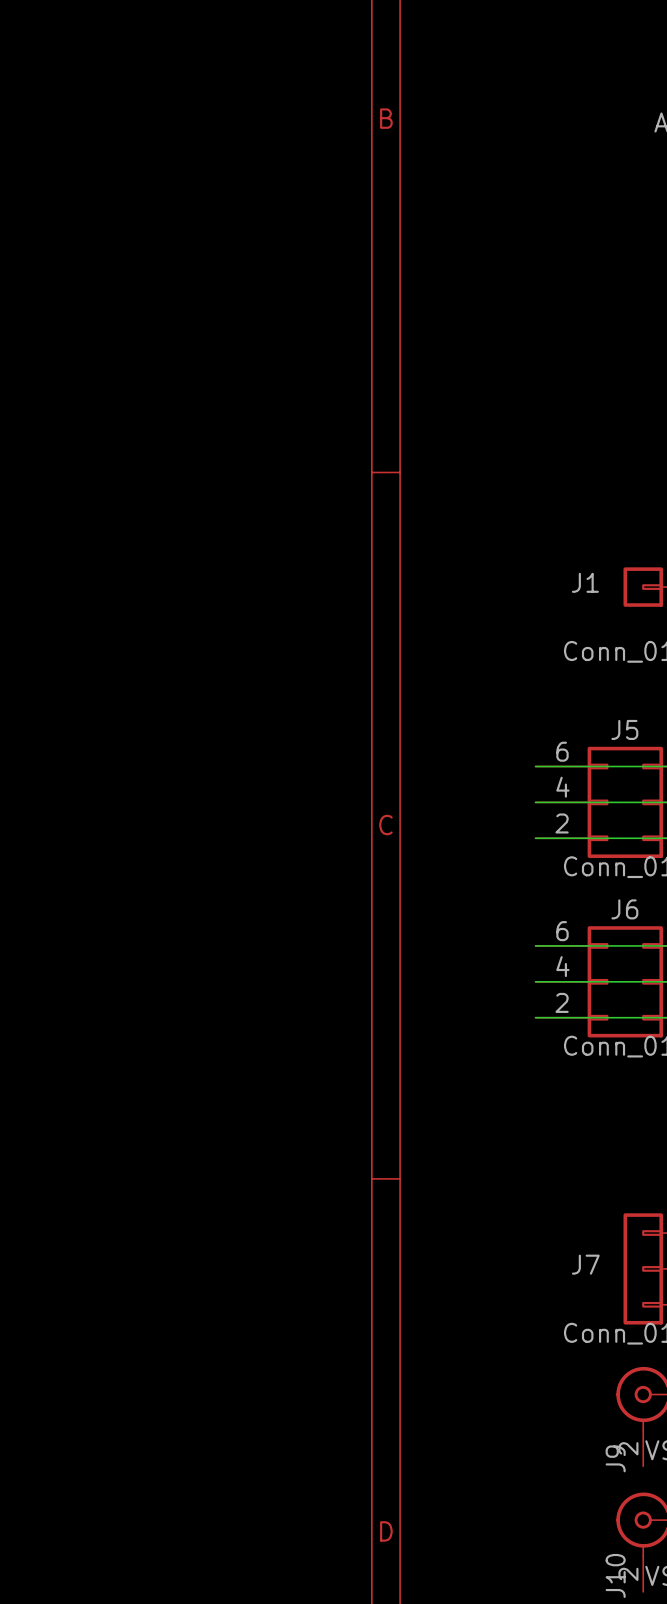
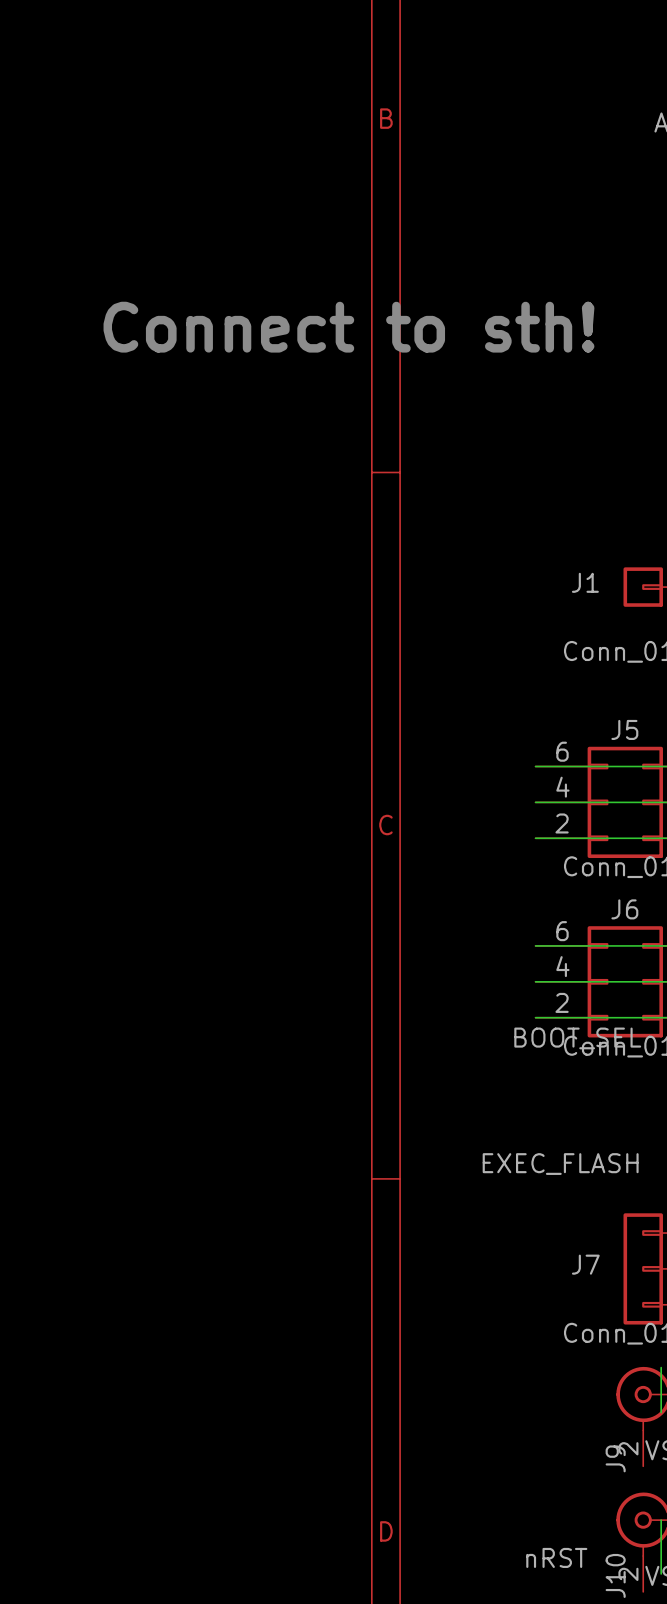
text: none -> Connect to sth! (348, 327)
label: none -> BOOT_SEL (577, 1038)
label: none -> EXEC_FLASH (560, 1164)
wire: none -> (661, 1367) (661, 1412)
wire: none -> (661, 1520) (661, 1573)
label: none -> nRST (556, 1557)

